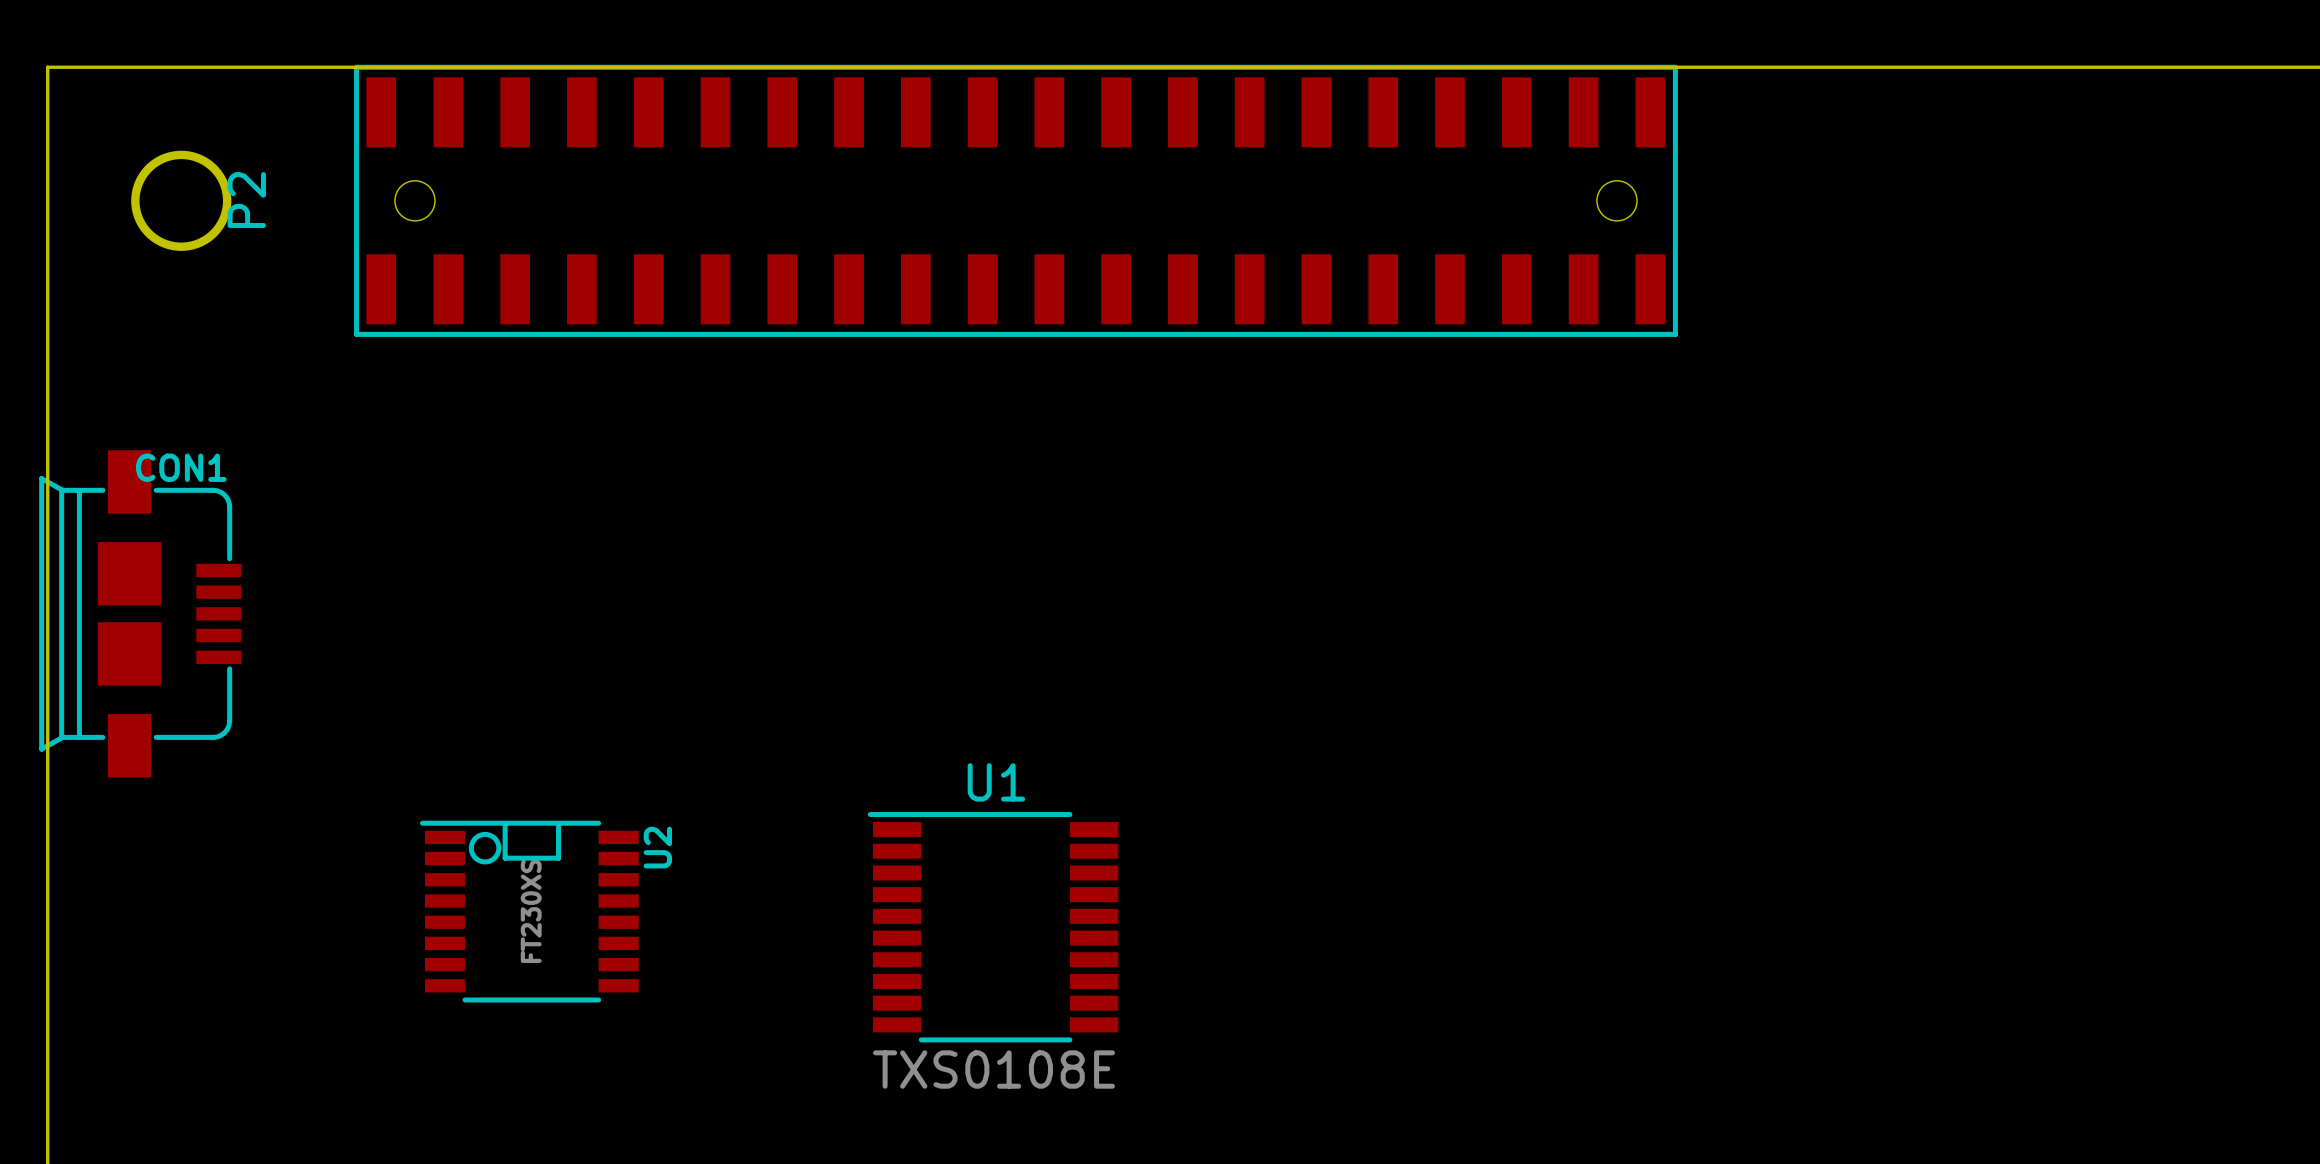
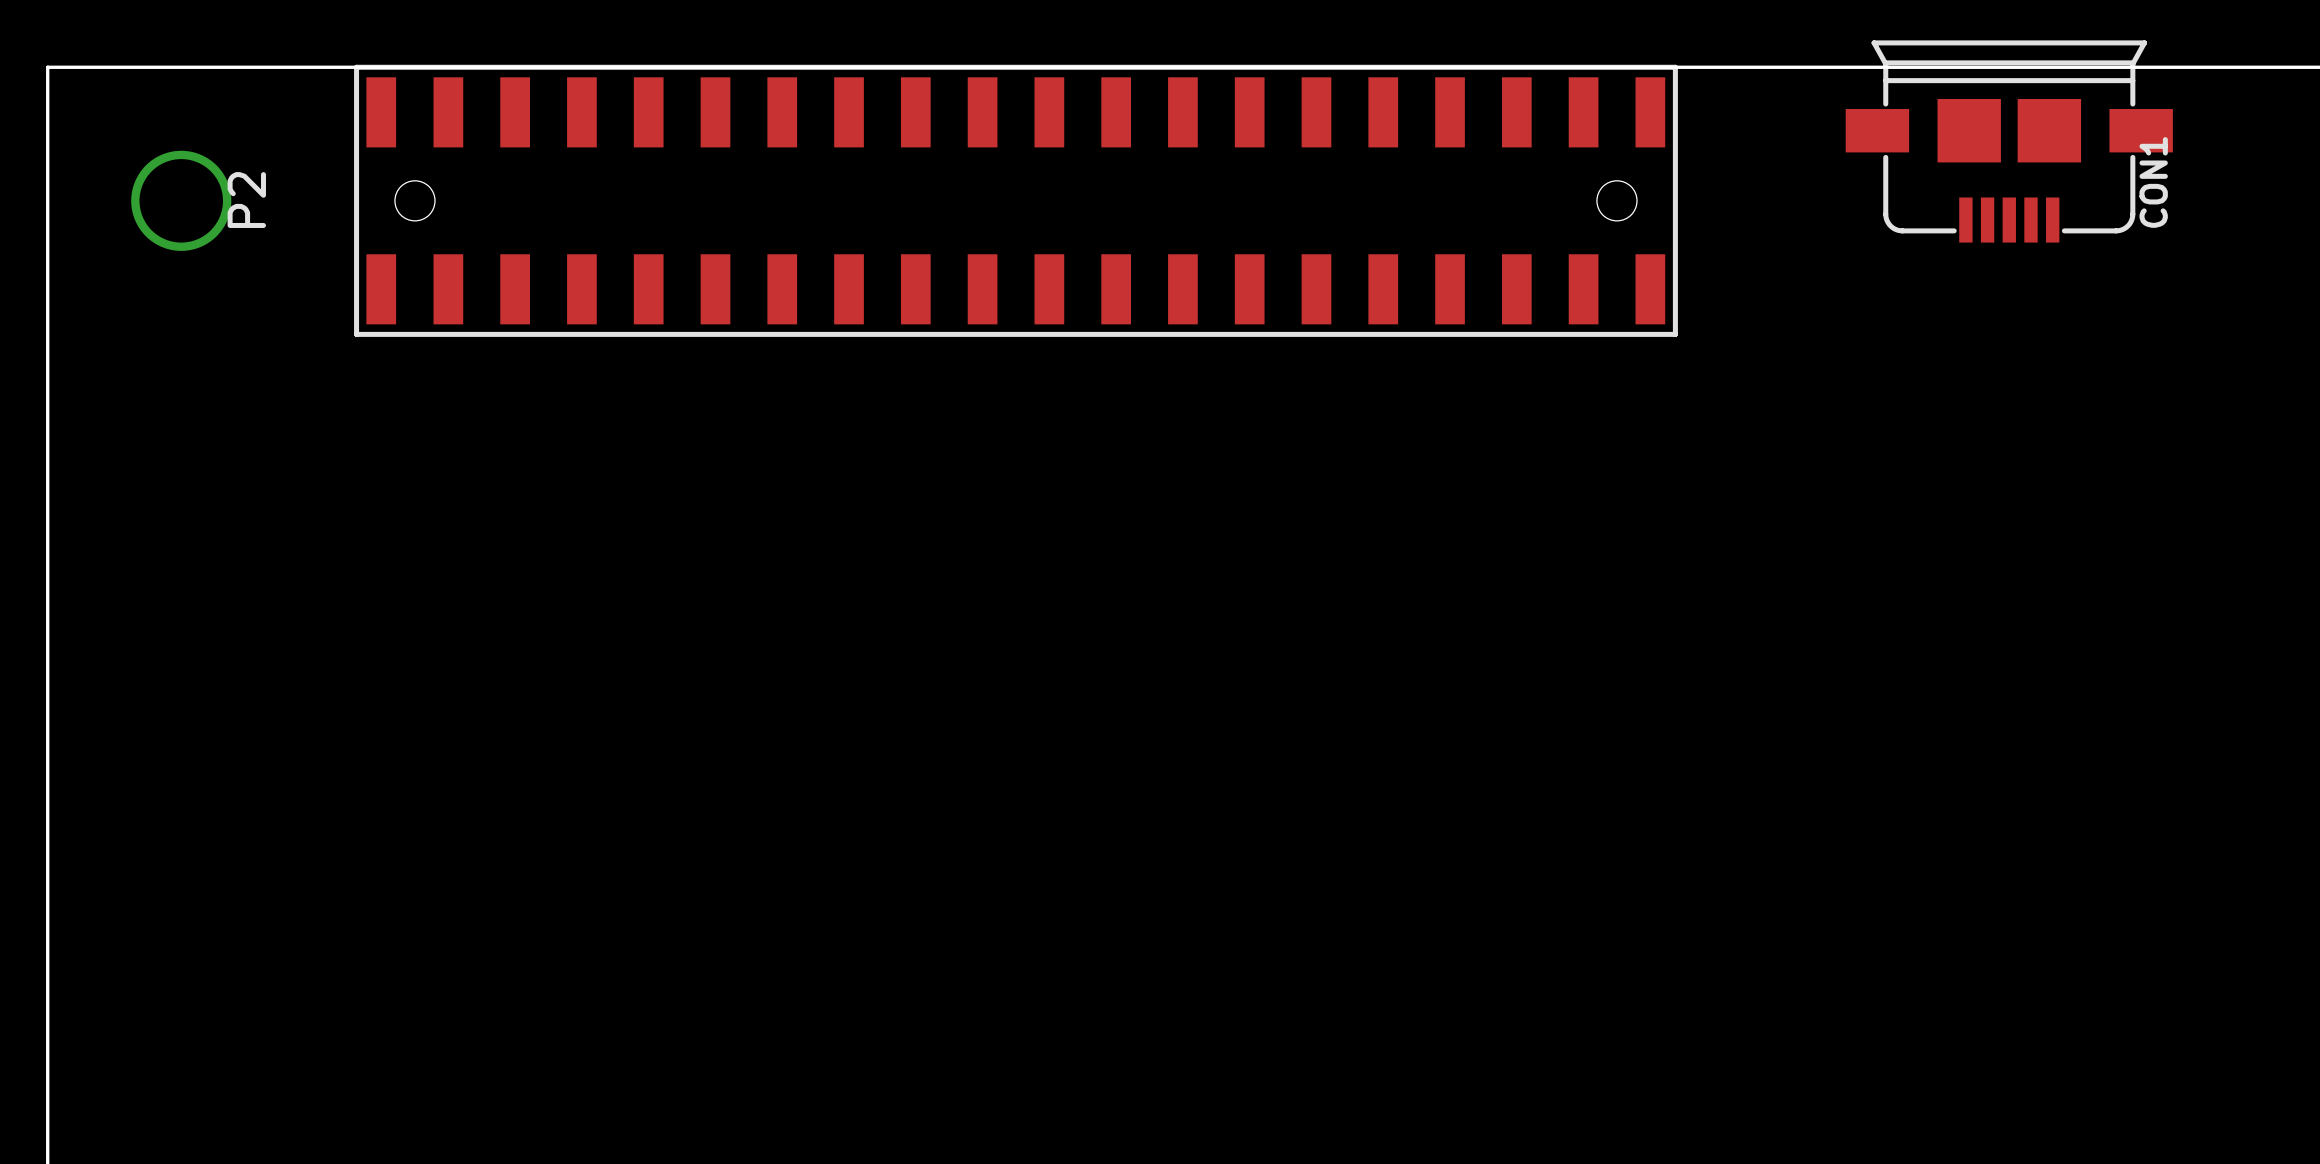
CON1 rotation: 0° (140, 613) -> 90° clockwise (2009, 141)
CON1 position: (140, 613) -> (2009, 141)
U2: FT230XS (529, 911) -> none
U1: TXS0108E (993, 927) -> none

